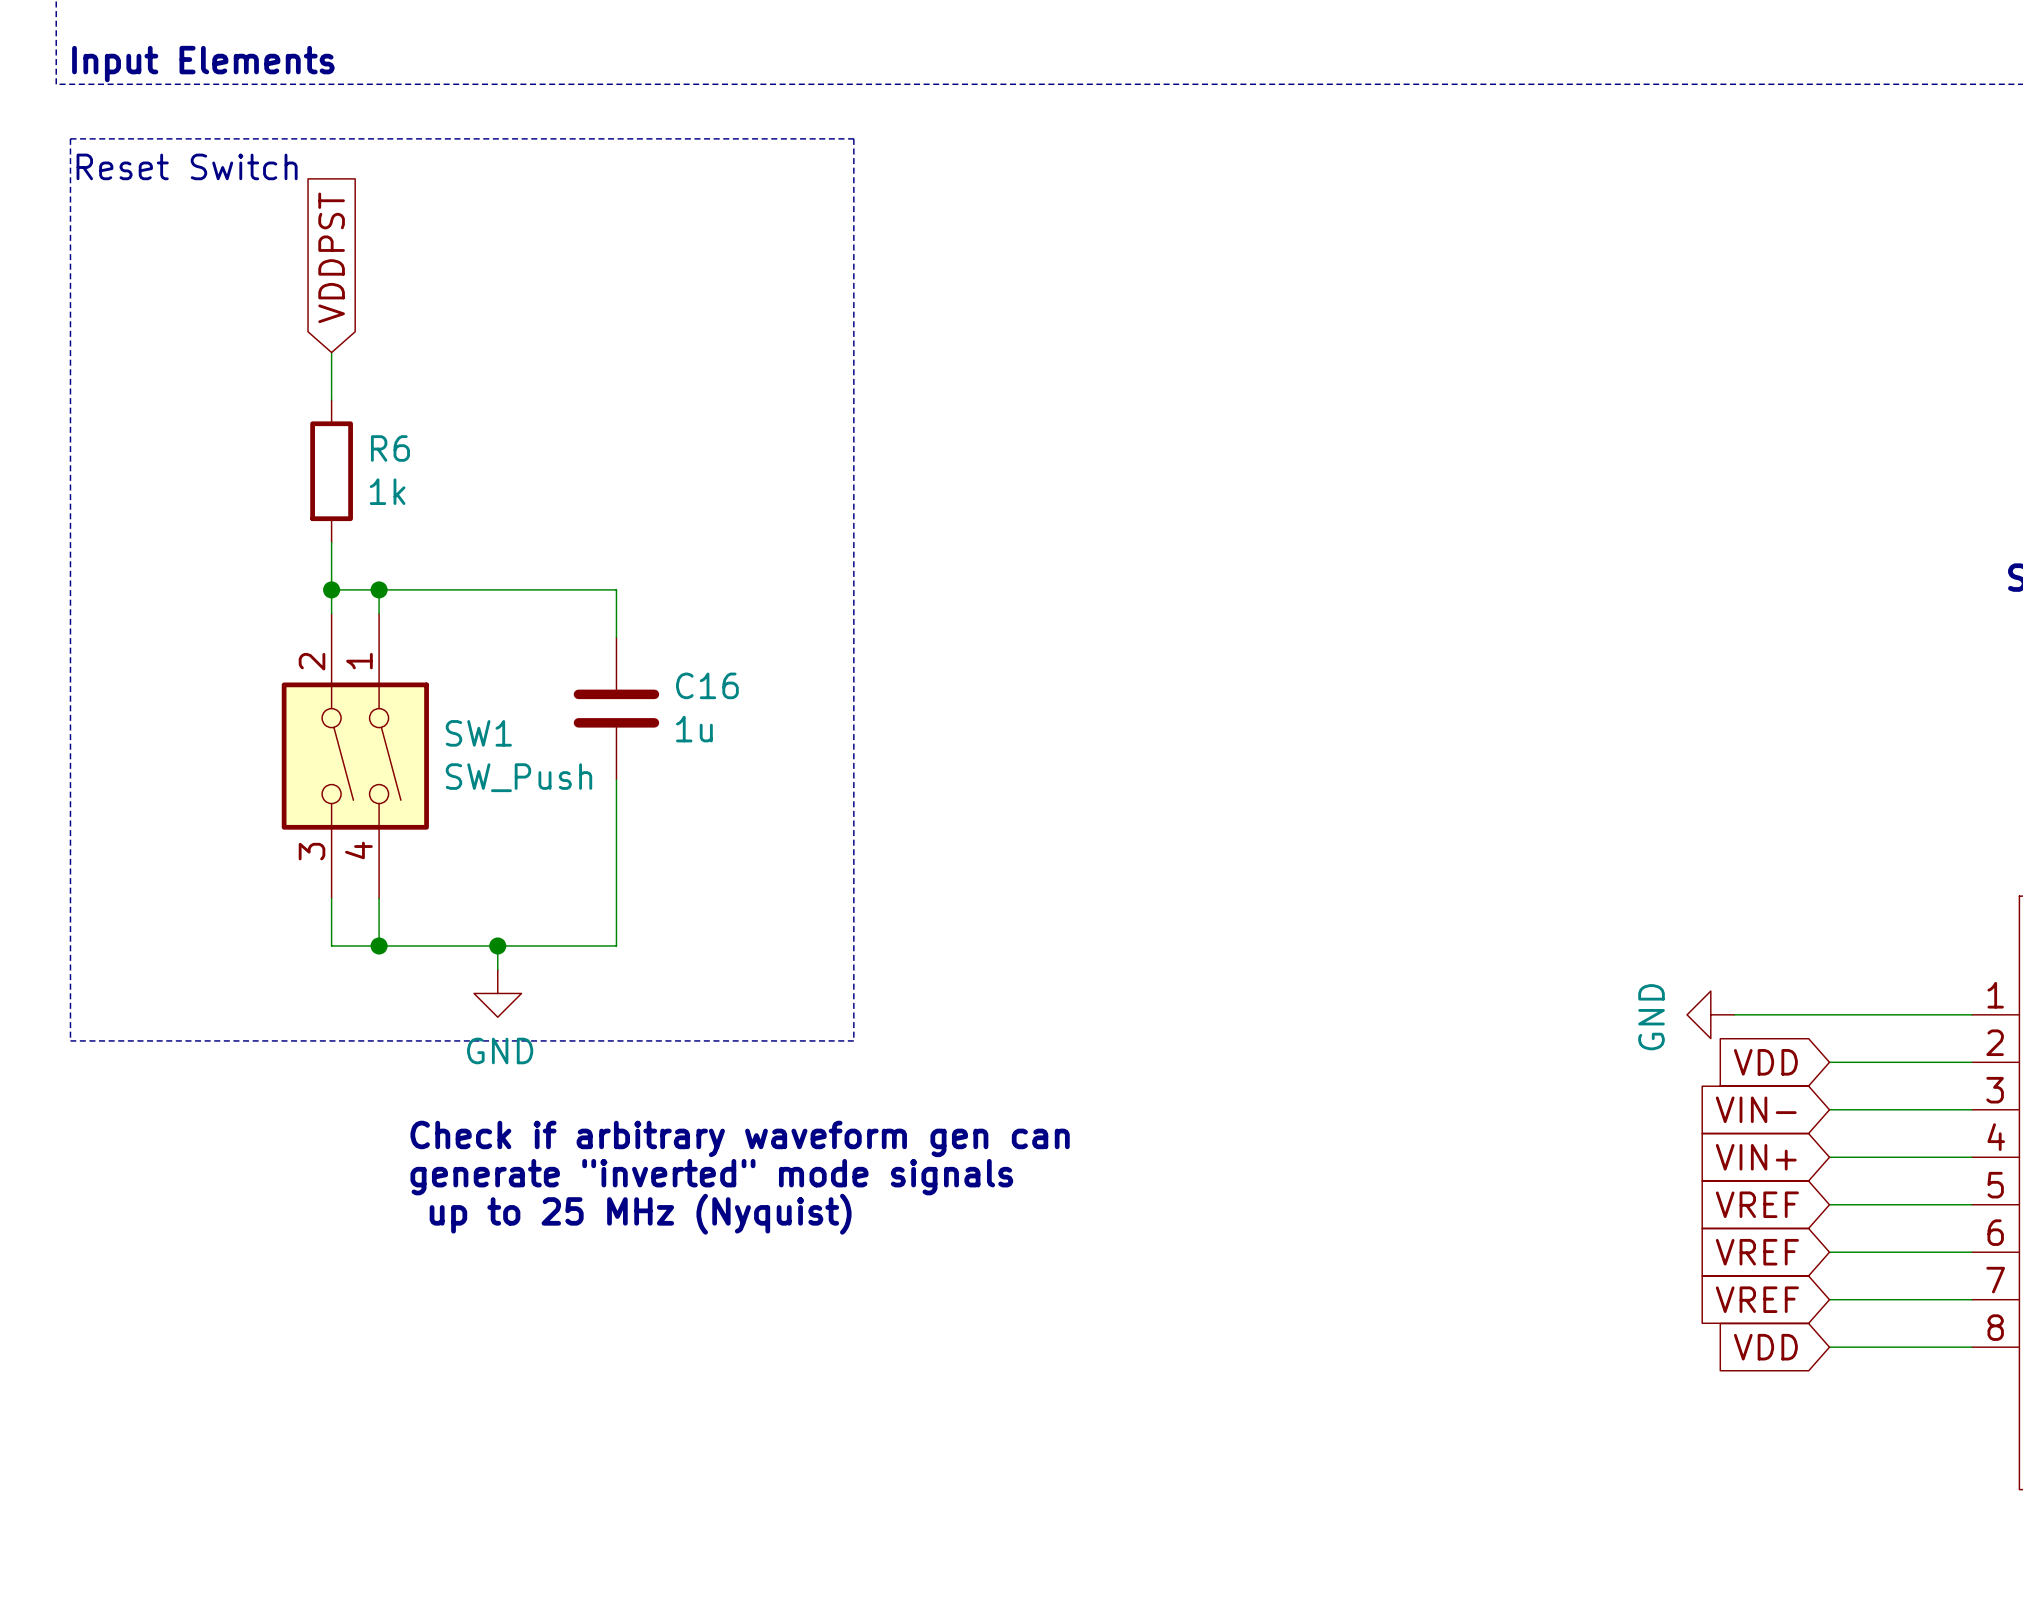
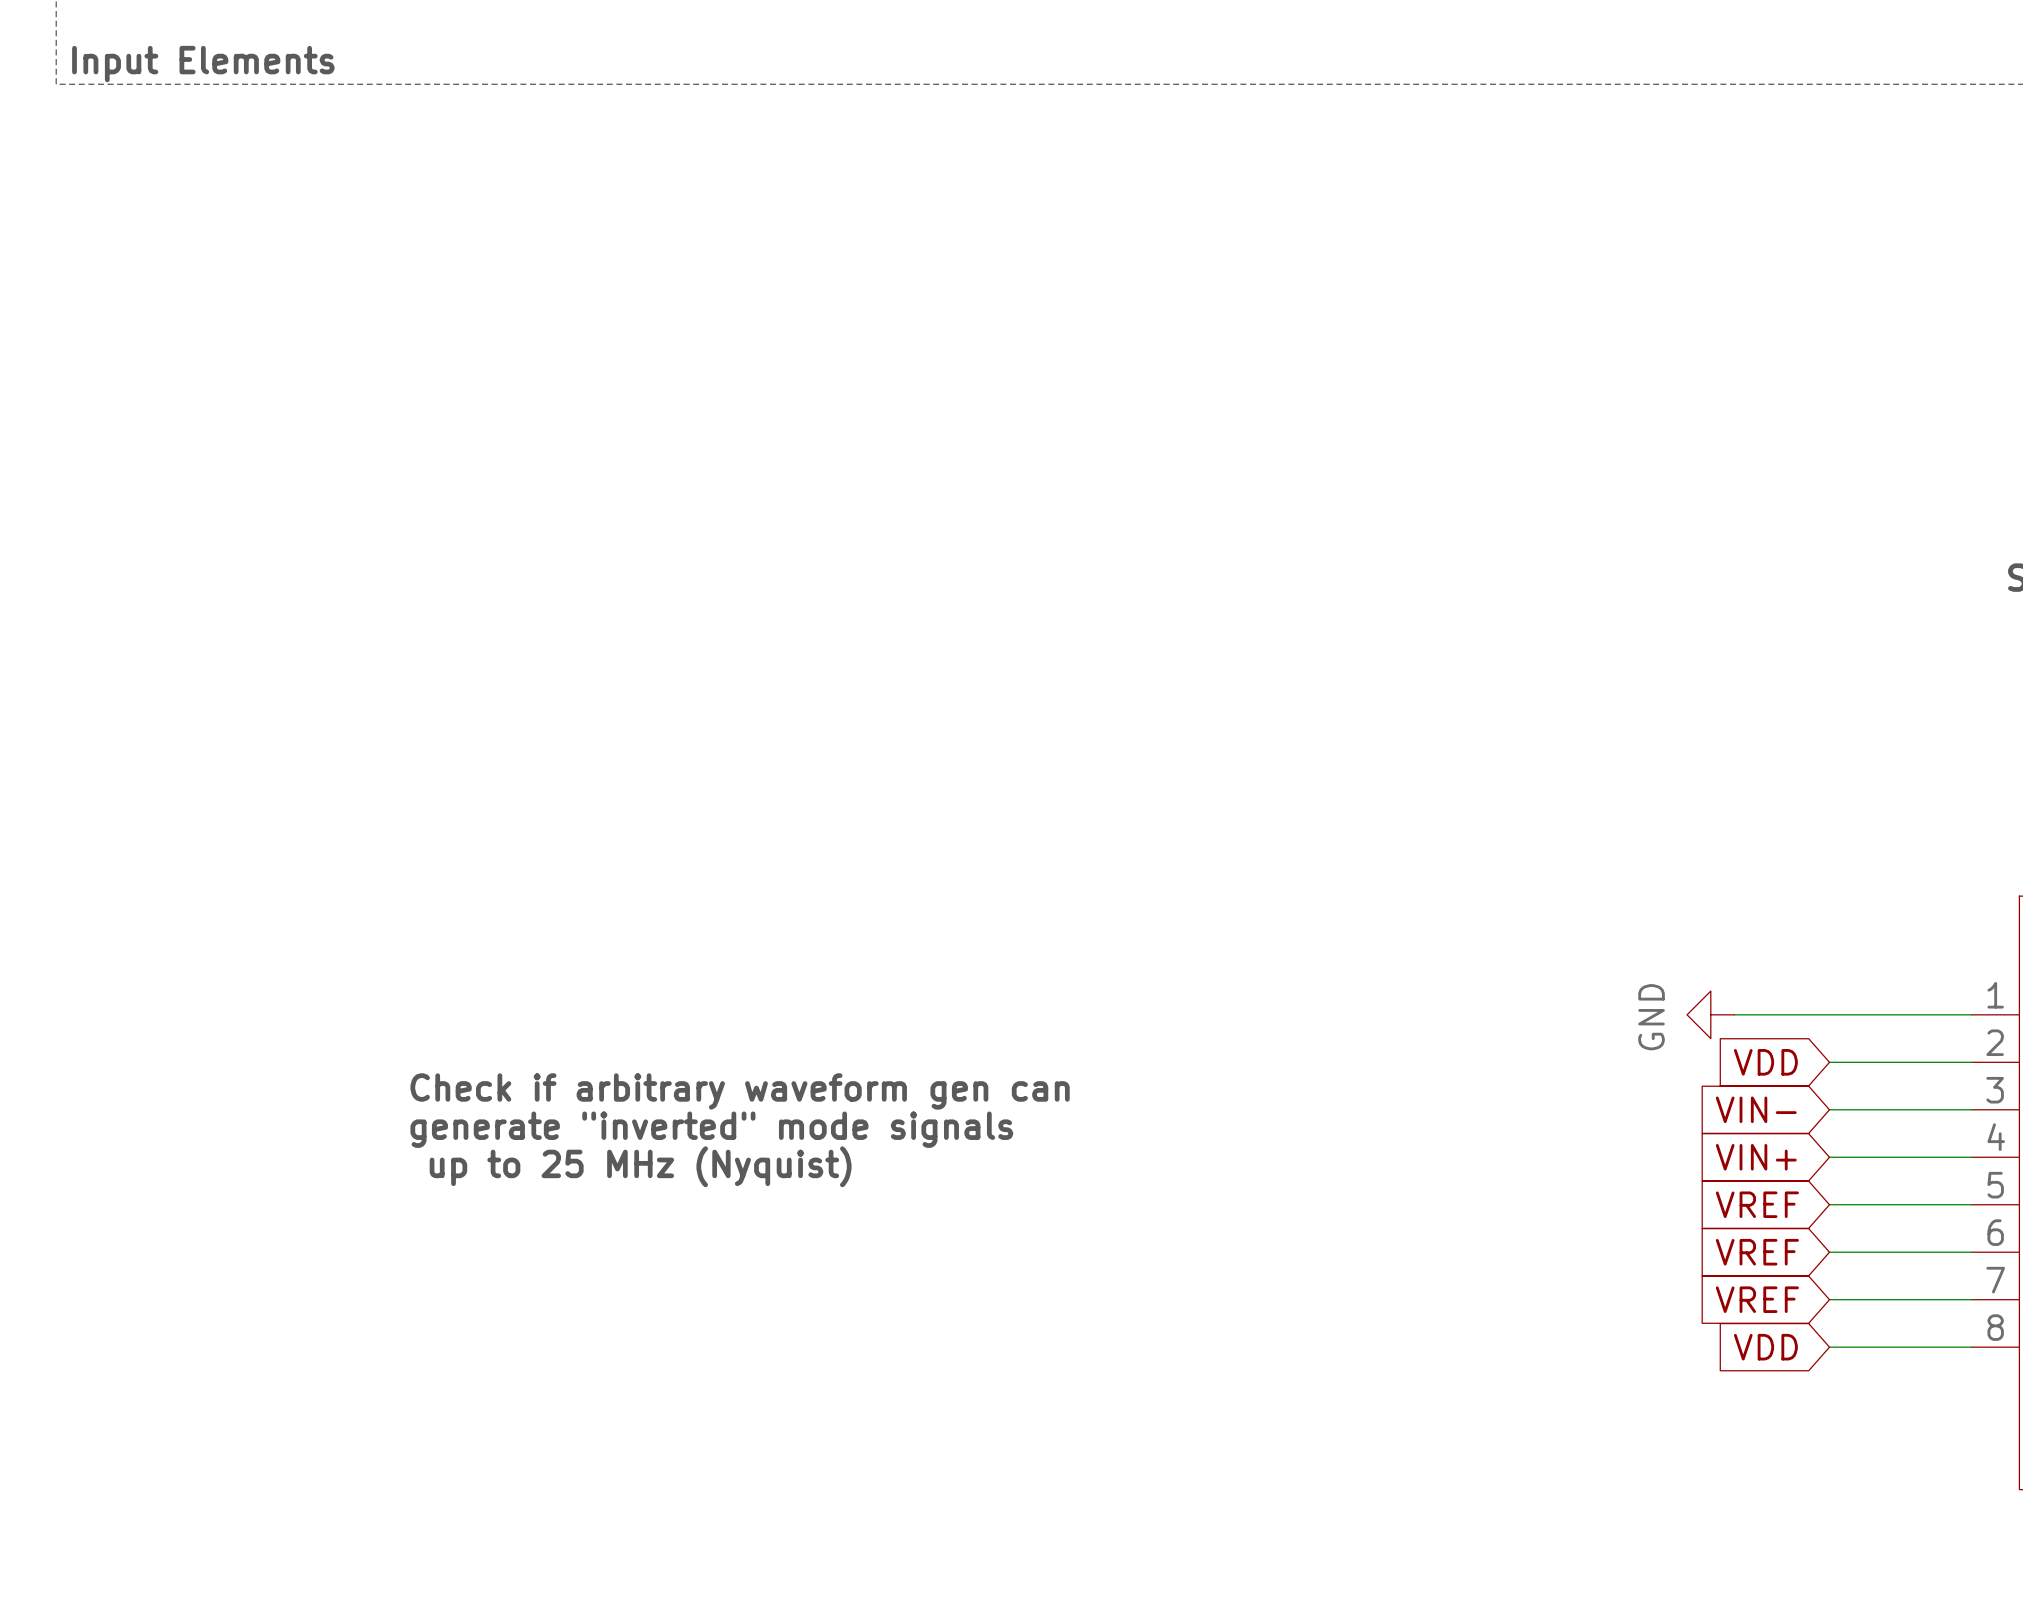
line: (70, 138) (70, 1040) (853, 1040) (853, 138) (70, 138) -> none
text: Reset Switch (187, 166) -> none
global label: VDDPST (331, 257) -> none
wire: (331, 352) (331, 400) -> none
R6: 1k (331, 471) -> none
wire: (331, 542) (331, 613) -> none
wire: (331, 589) (616, 589) (616, 637) -> none
junction: (331, 589) -> none
wire: (379, 589) (379, 613) -> none
junction: (379, 589) -> none
C16: 1u (616, 708) -> none
SW1: SW_Push (355, 756) -> none
wire: (616, 779) (616, 945) (331, 945) (331, 898) -> none
wire: (379, 898) (379, 945) -> none
junction: (379, 945) -> none
wire: (497, 945) (497, 969) -> none
junction: (497, 945) -> none
power symbol: GND (497, 993) -> none
text position: Check if arbitrary waveform gen can (740, 1138) -> Check if arbitrary waveform gen can (740, 1091)
text position: generate "inverted" mode signals (711, 1177) -> generate "inverted" mode signals (711, 1129)
text position: up to 25 MHz (Nyquist) (640, 1214) -> up to 25 MHz (Nyquist) (640, 1166)

